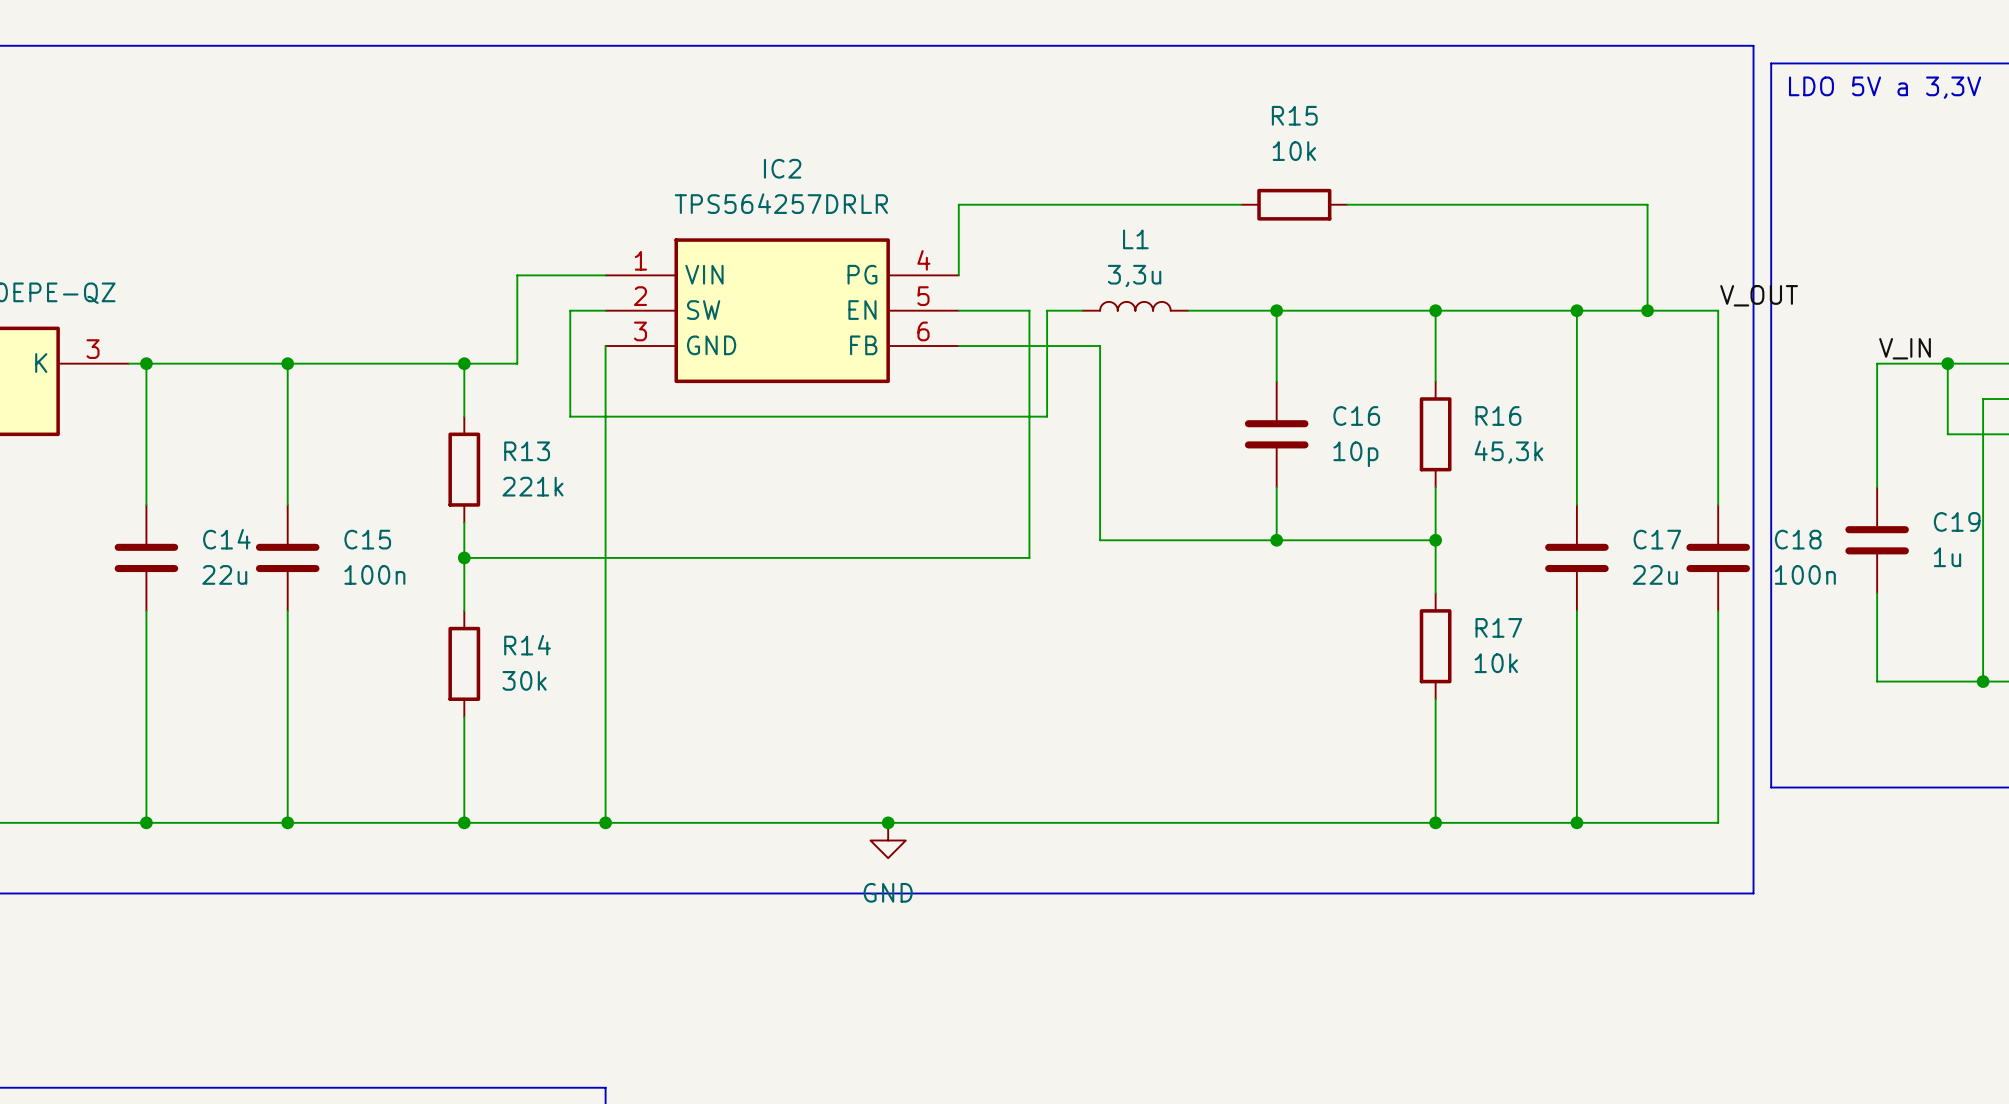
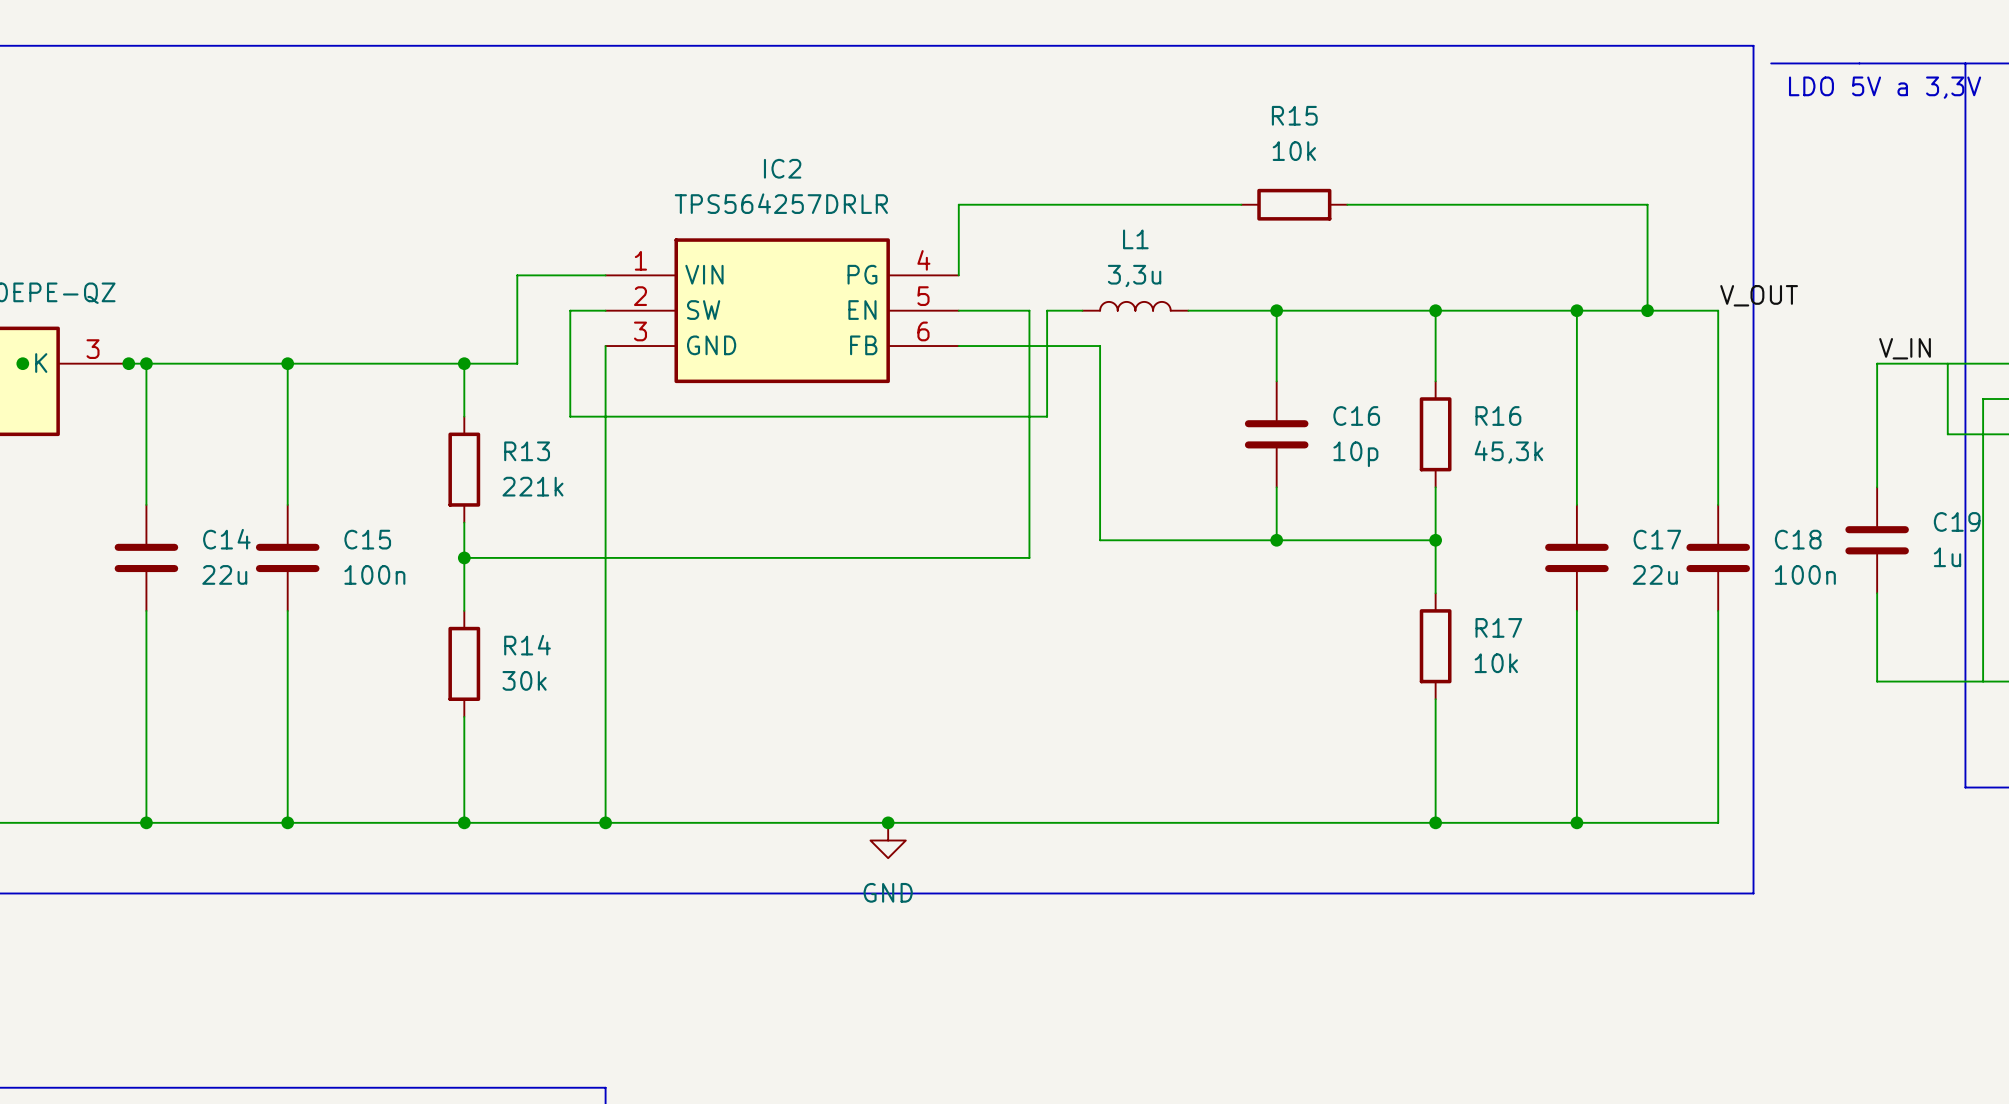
line: (1771, 63) (1771, 787) (1965, 787) -> (1965, 63) (1965, 787)
junction: none -> (22, 363)
junction: none -> (128, 363)
junction: (1947, 363) -> none
junction: (1983, 681) -> none

